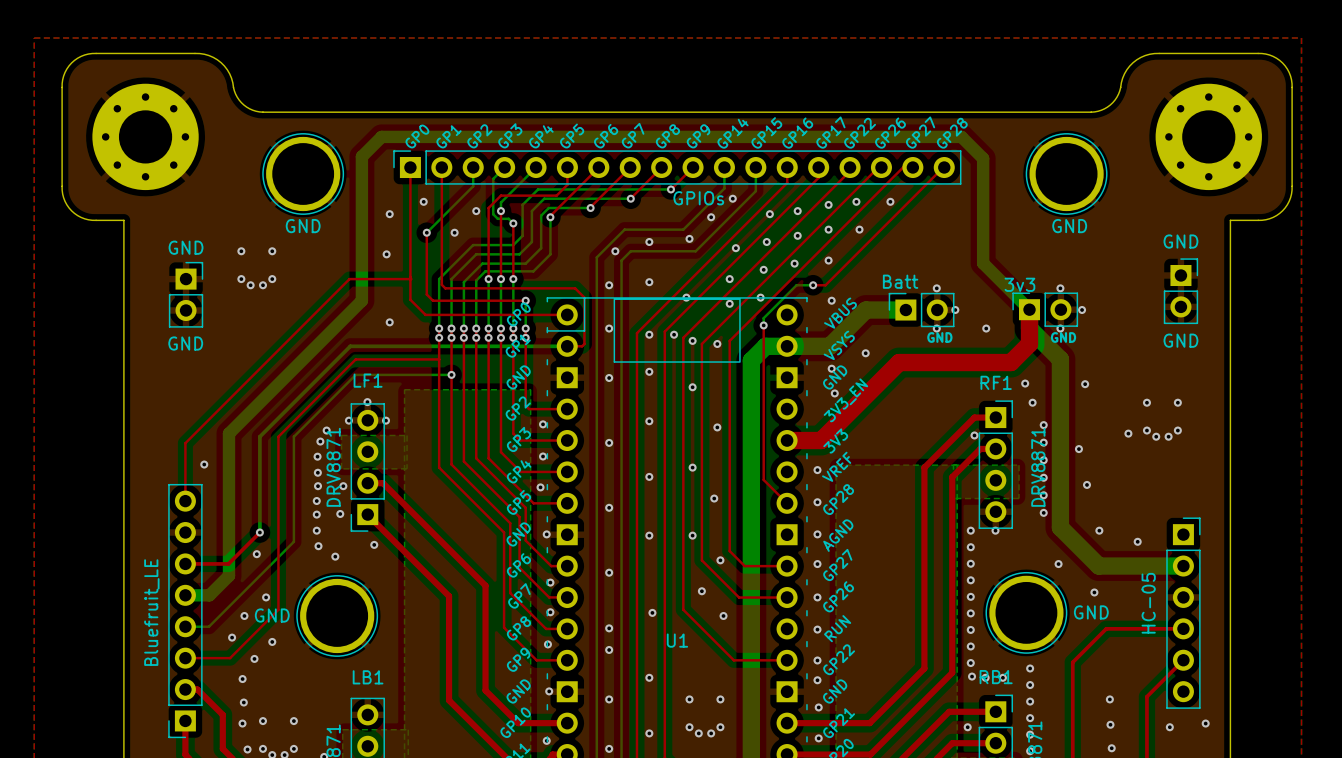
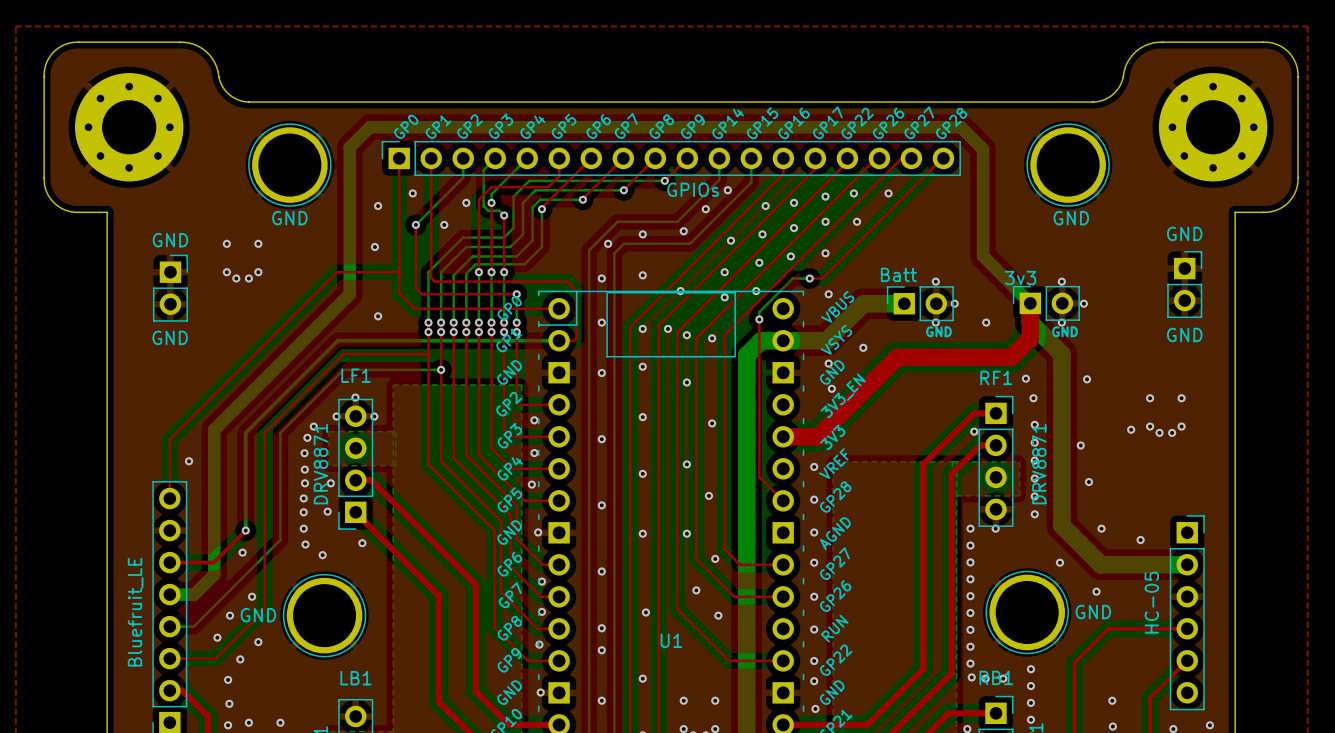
via: (1043, 425) -> none
via: none -> (1034, 424)
via: (1043, 442) -> none
via: none -> (1034, 442)
via: (1043, 460) -> none
via: none -> (1034, 460)
via: (1043, 477) -> none
via: none -> (1034, 478)
via: (1043, 495) -> none
via: none -> (1034, 496)
via: (1043, 512) -> none
via: none -> (1034, 514)

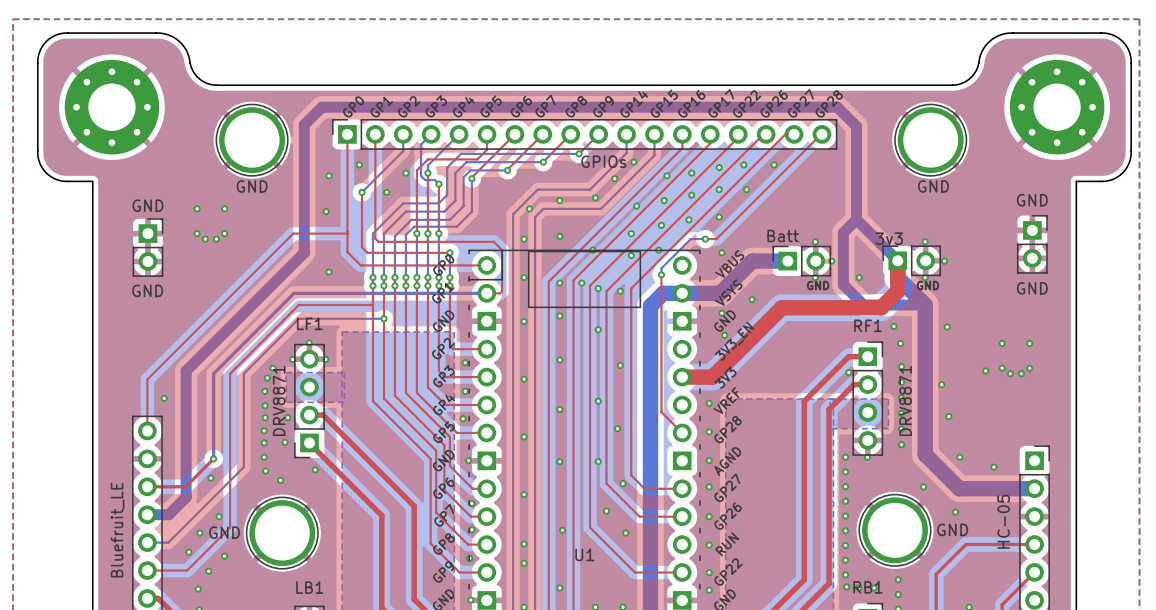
bottom track: none -> (856, 219) (843, 232) (843, 284) (863, 305) (925, 305)

